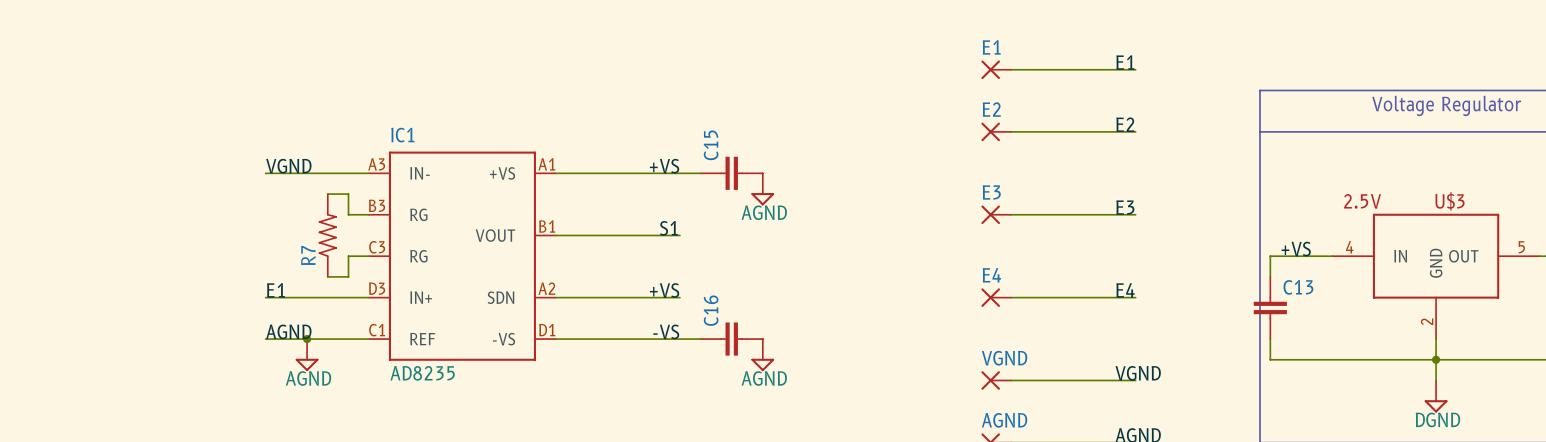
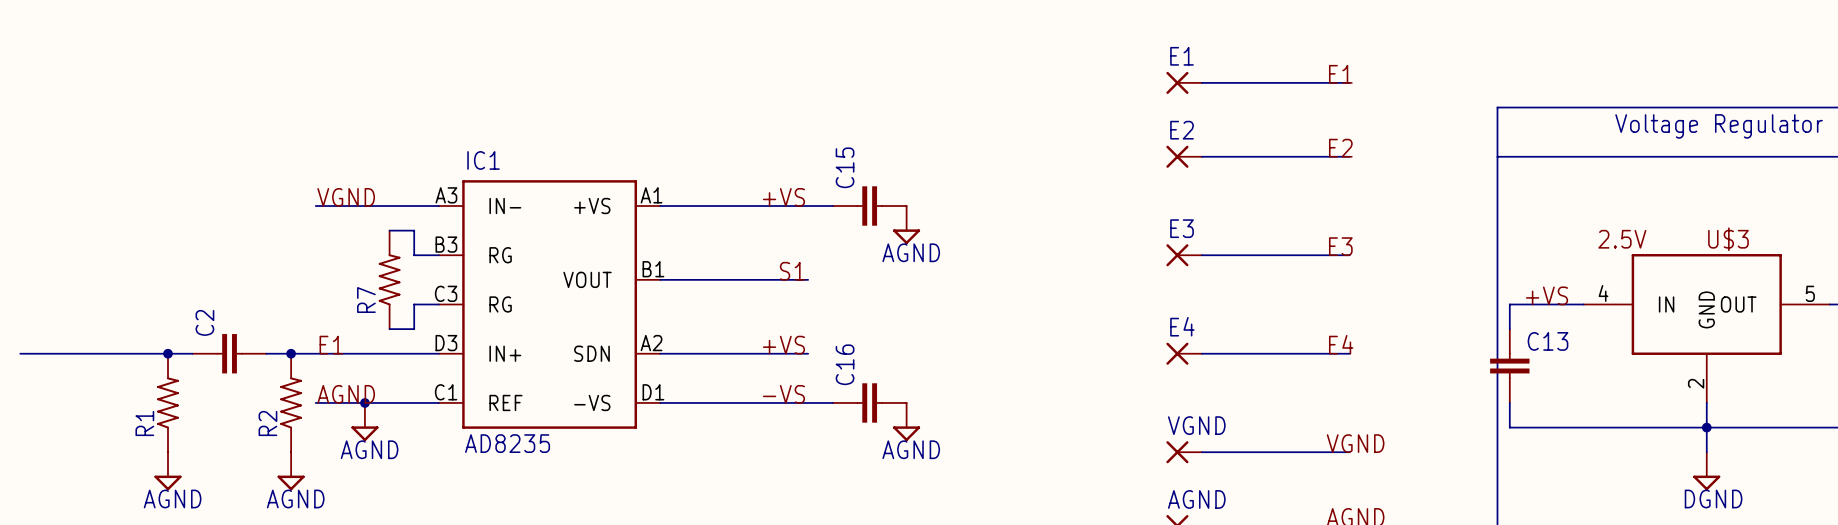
wire: none -> (20, 353) (192, 353)
junction: none -> (167, 353)
C2: none -> (229, 353)
wire: none -> (266, 353) (315, 353)
junction: none -> (291, 353)
R1: none -> (167, 402)
R2: none -> (291, 402)
power symbol: none -> AGND (167, 471)
power symbol: none -> AGND (291, 471)

